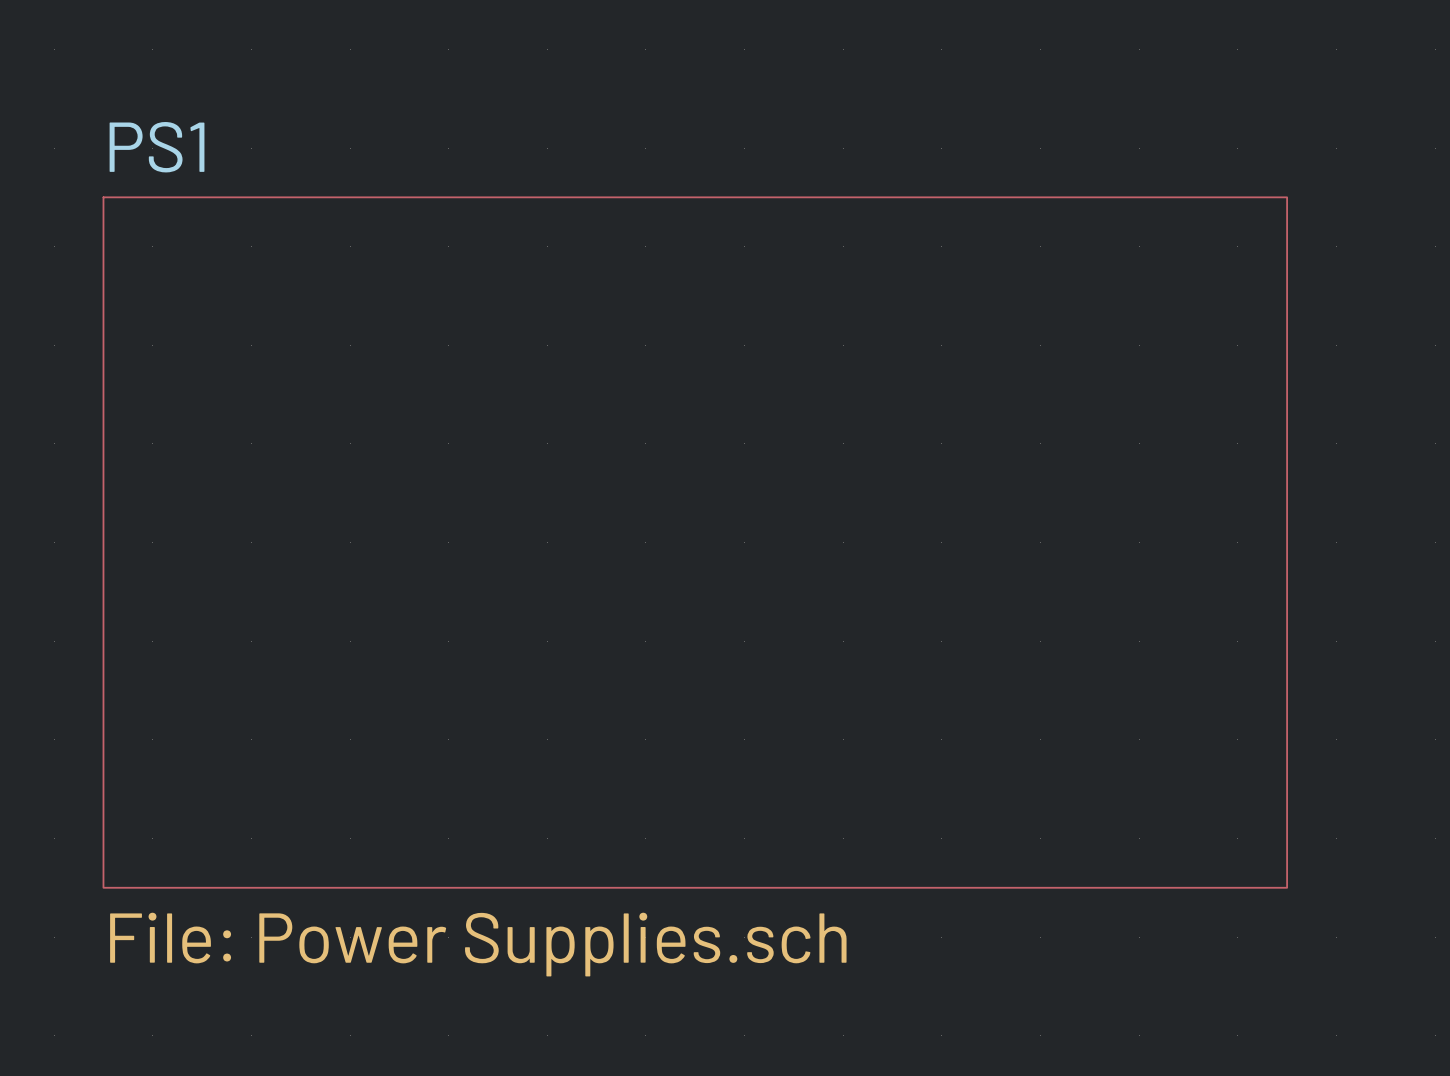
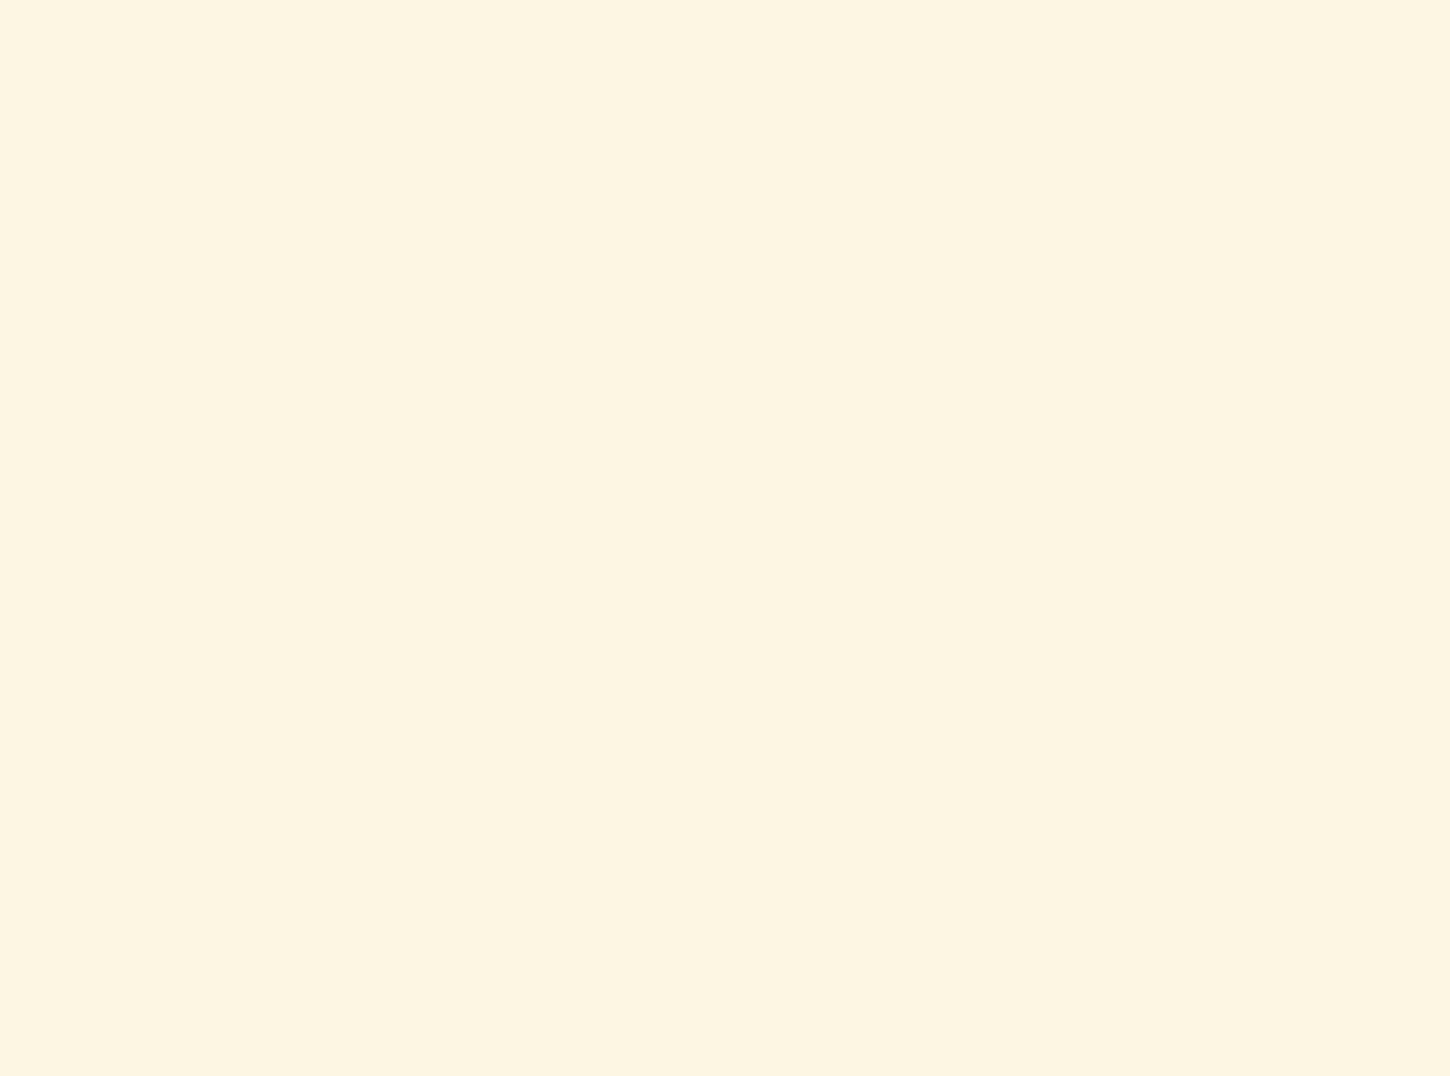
sheet PS1: File: Power Supplies.sch (695, 542) -> none

